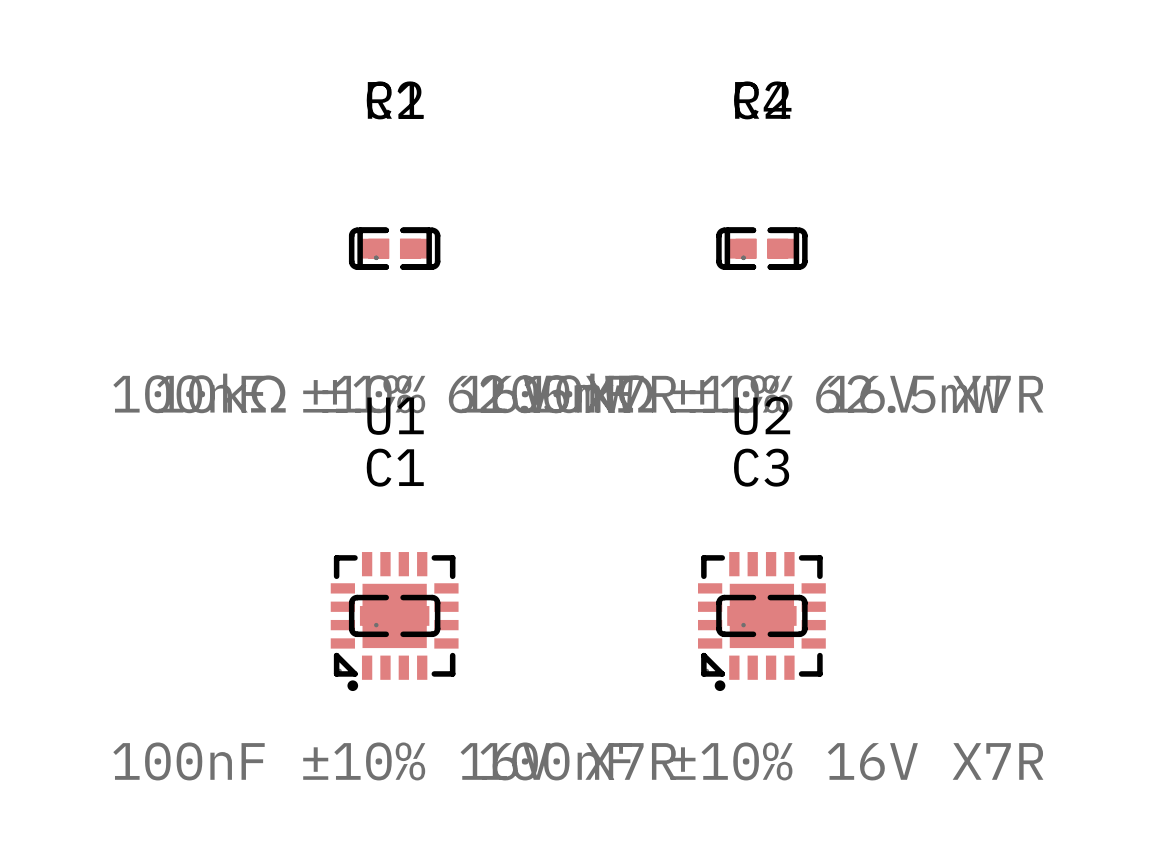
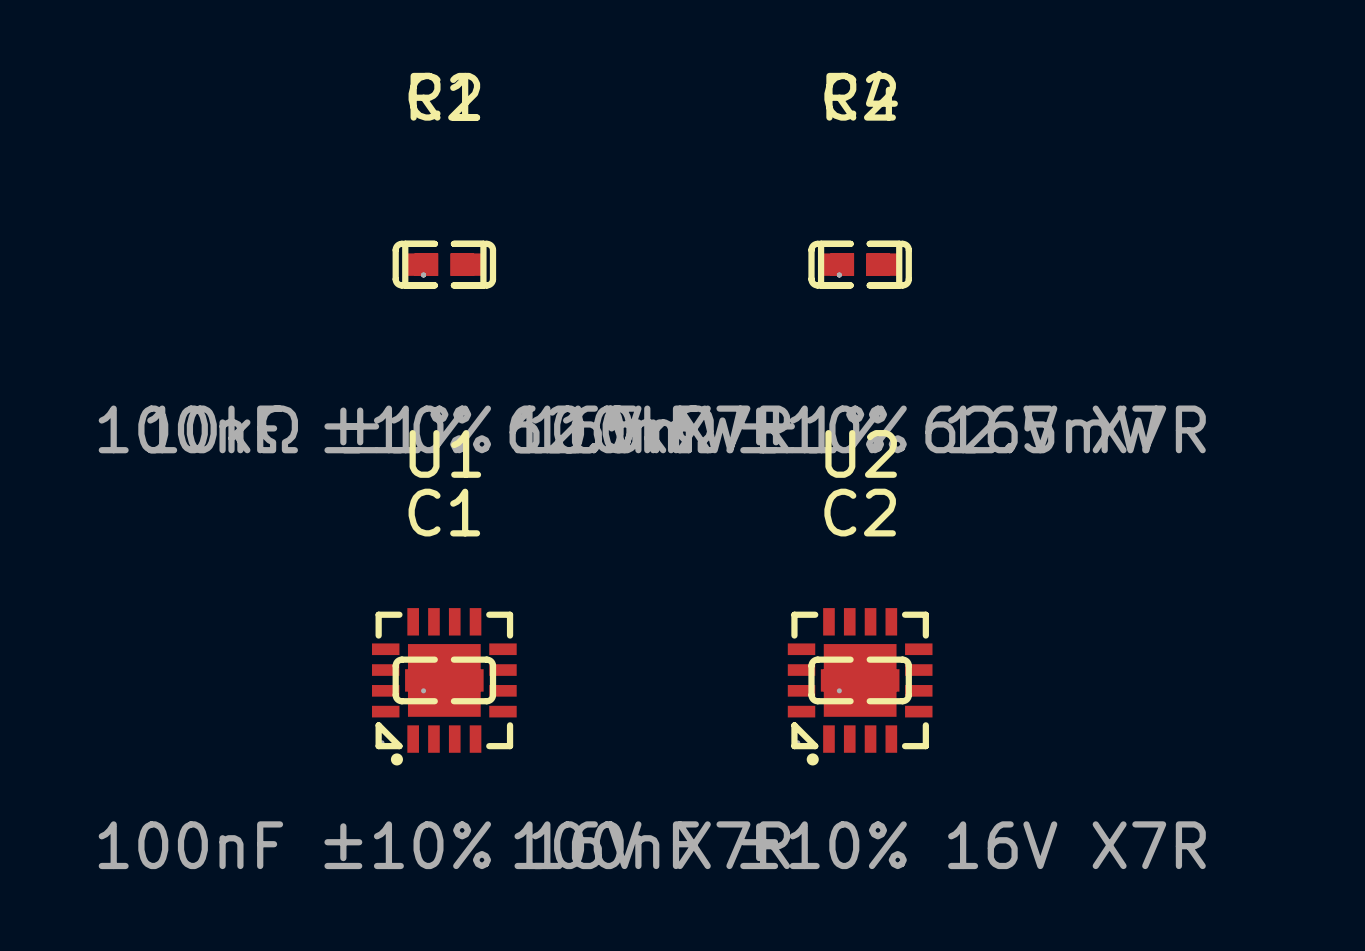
C3 name: C3 (761, 467) -> C2 (860, 512)

